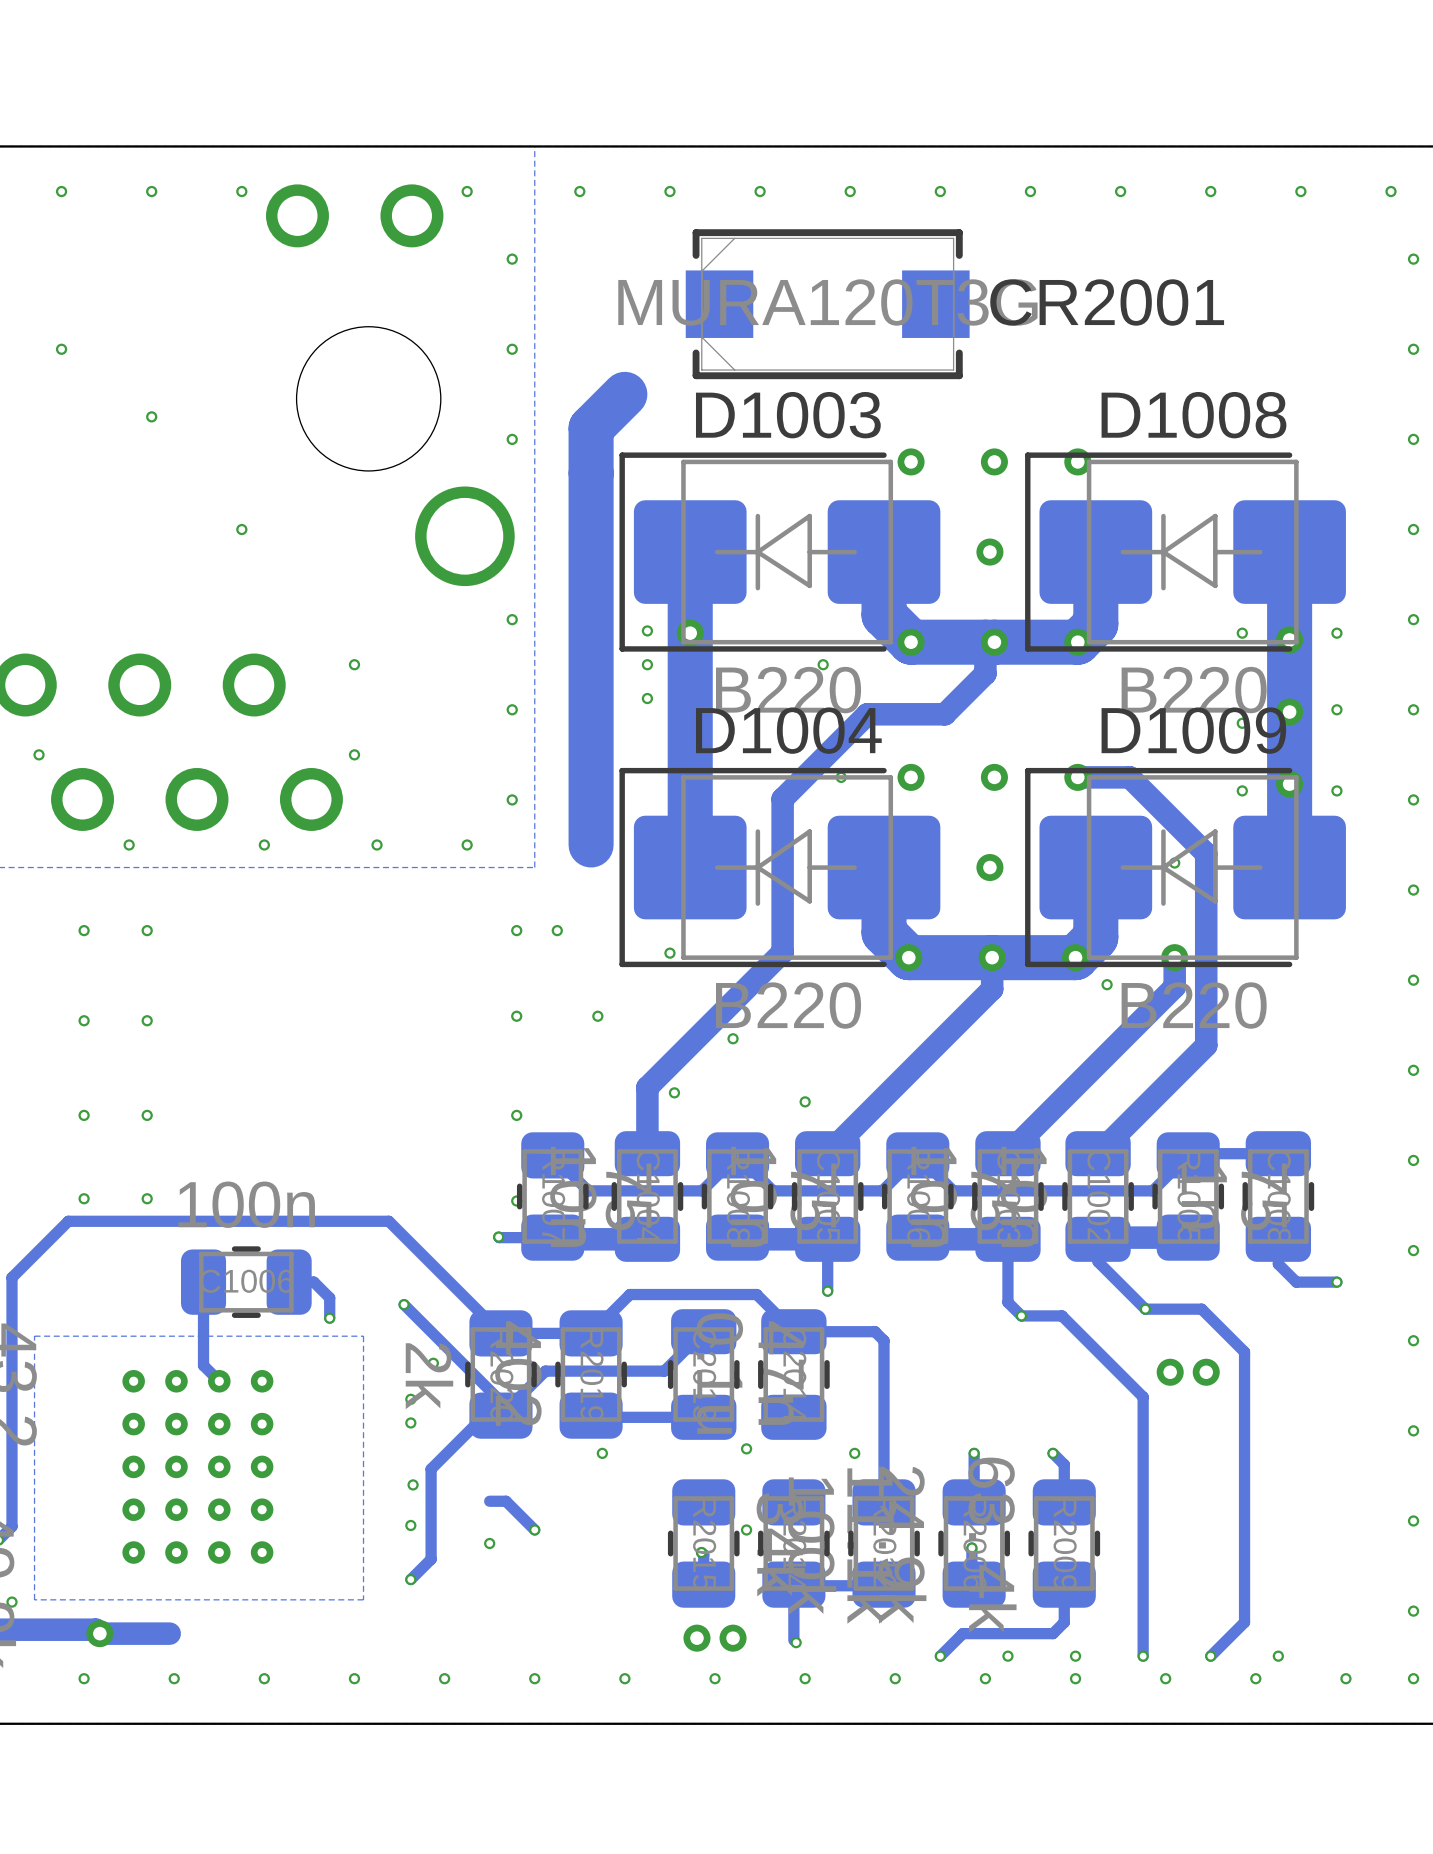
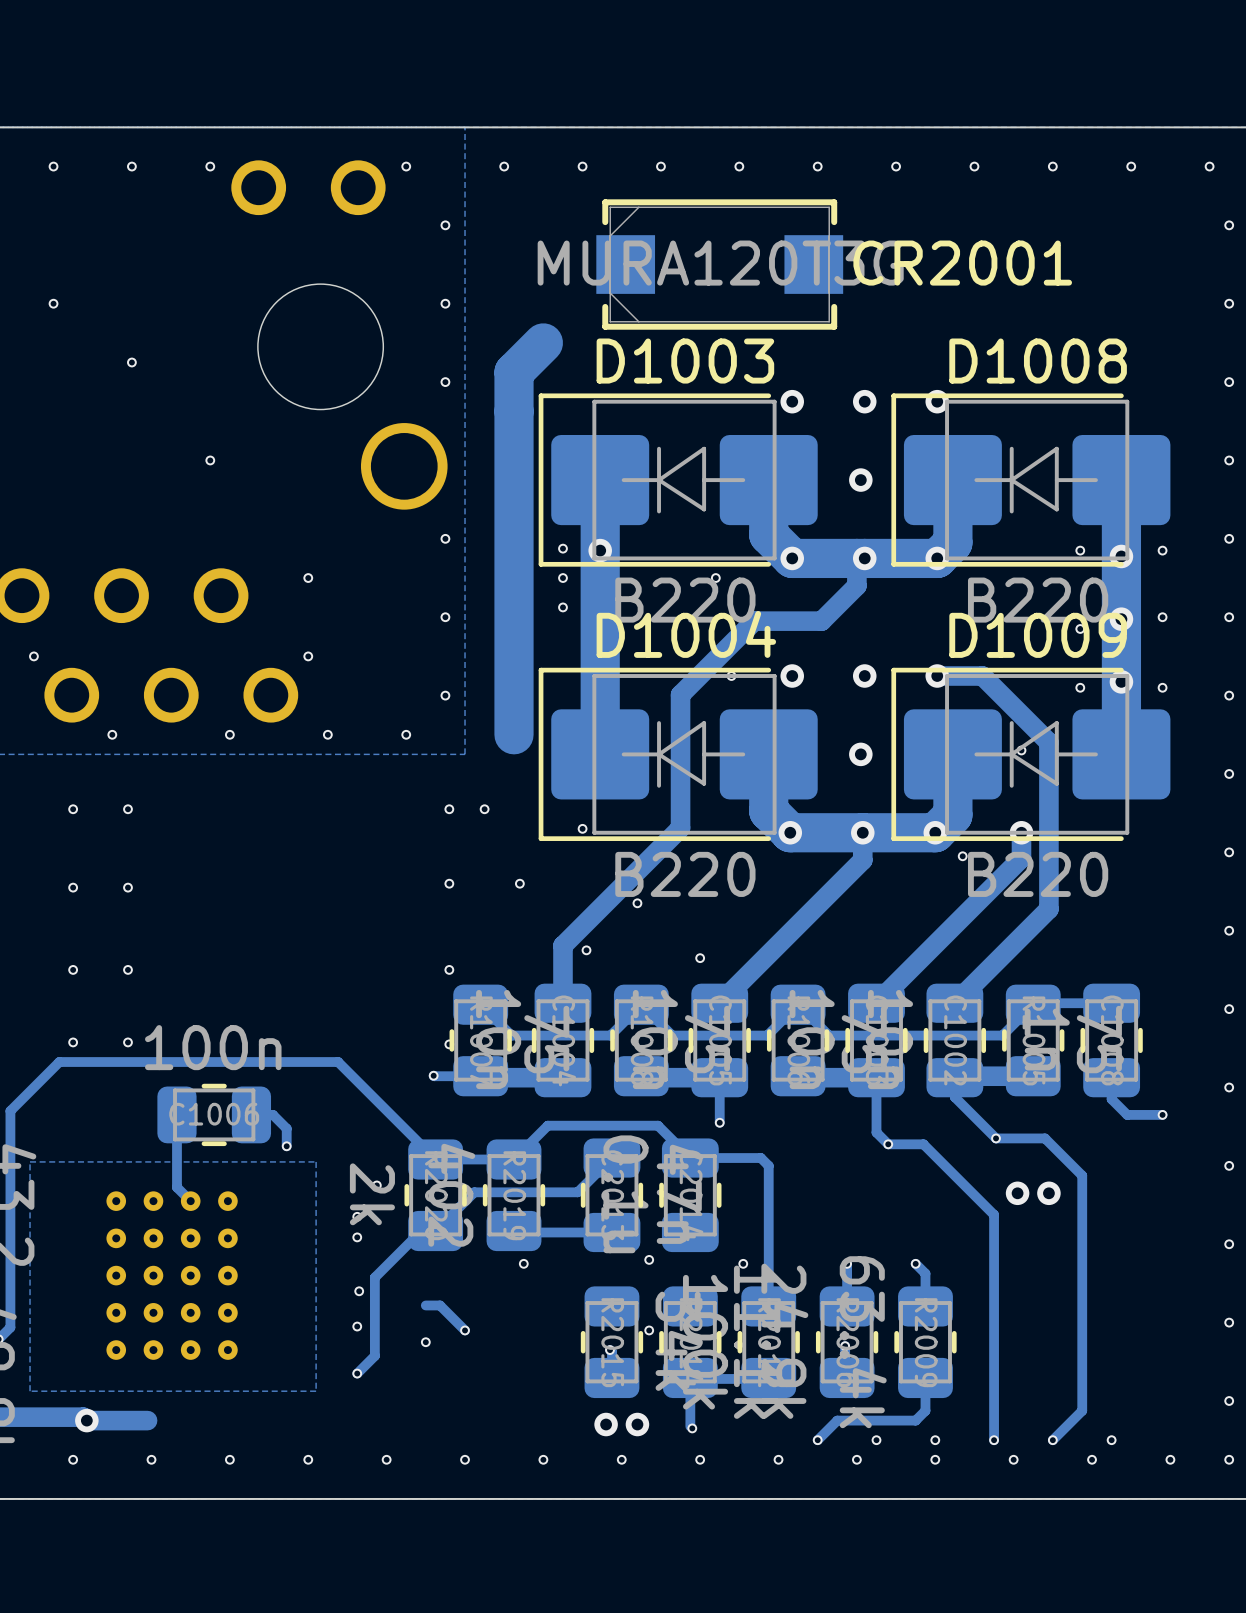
track: (404, 1304) (500, 1401) (500, 1415) -> none
via: (404, 1304) -> none
via: (11, 1602) -> none

